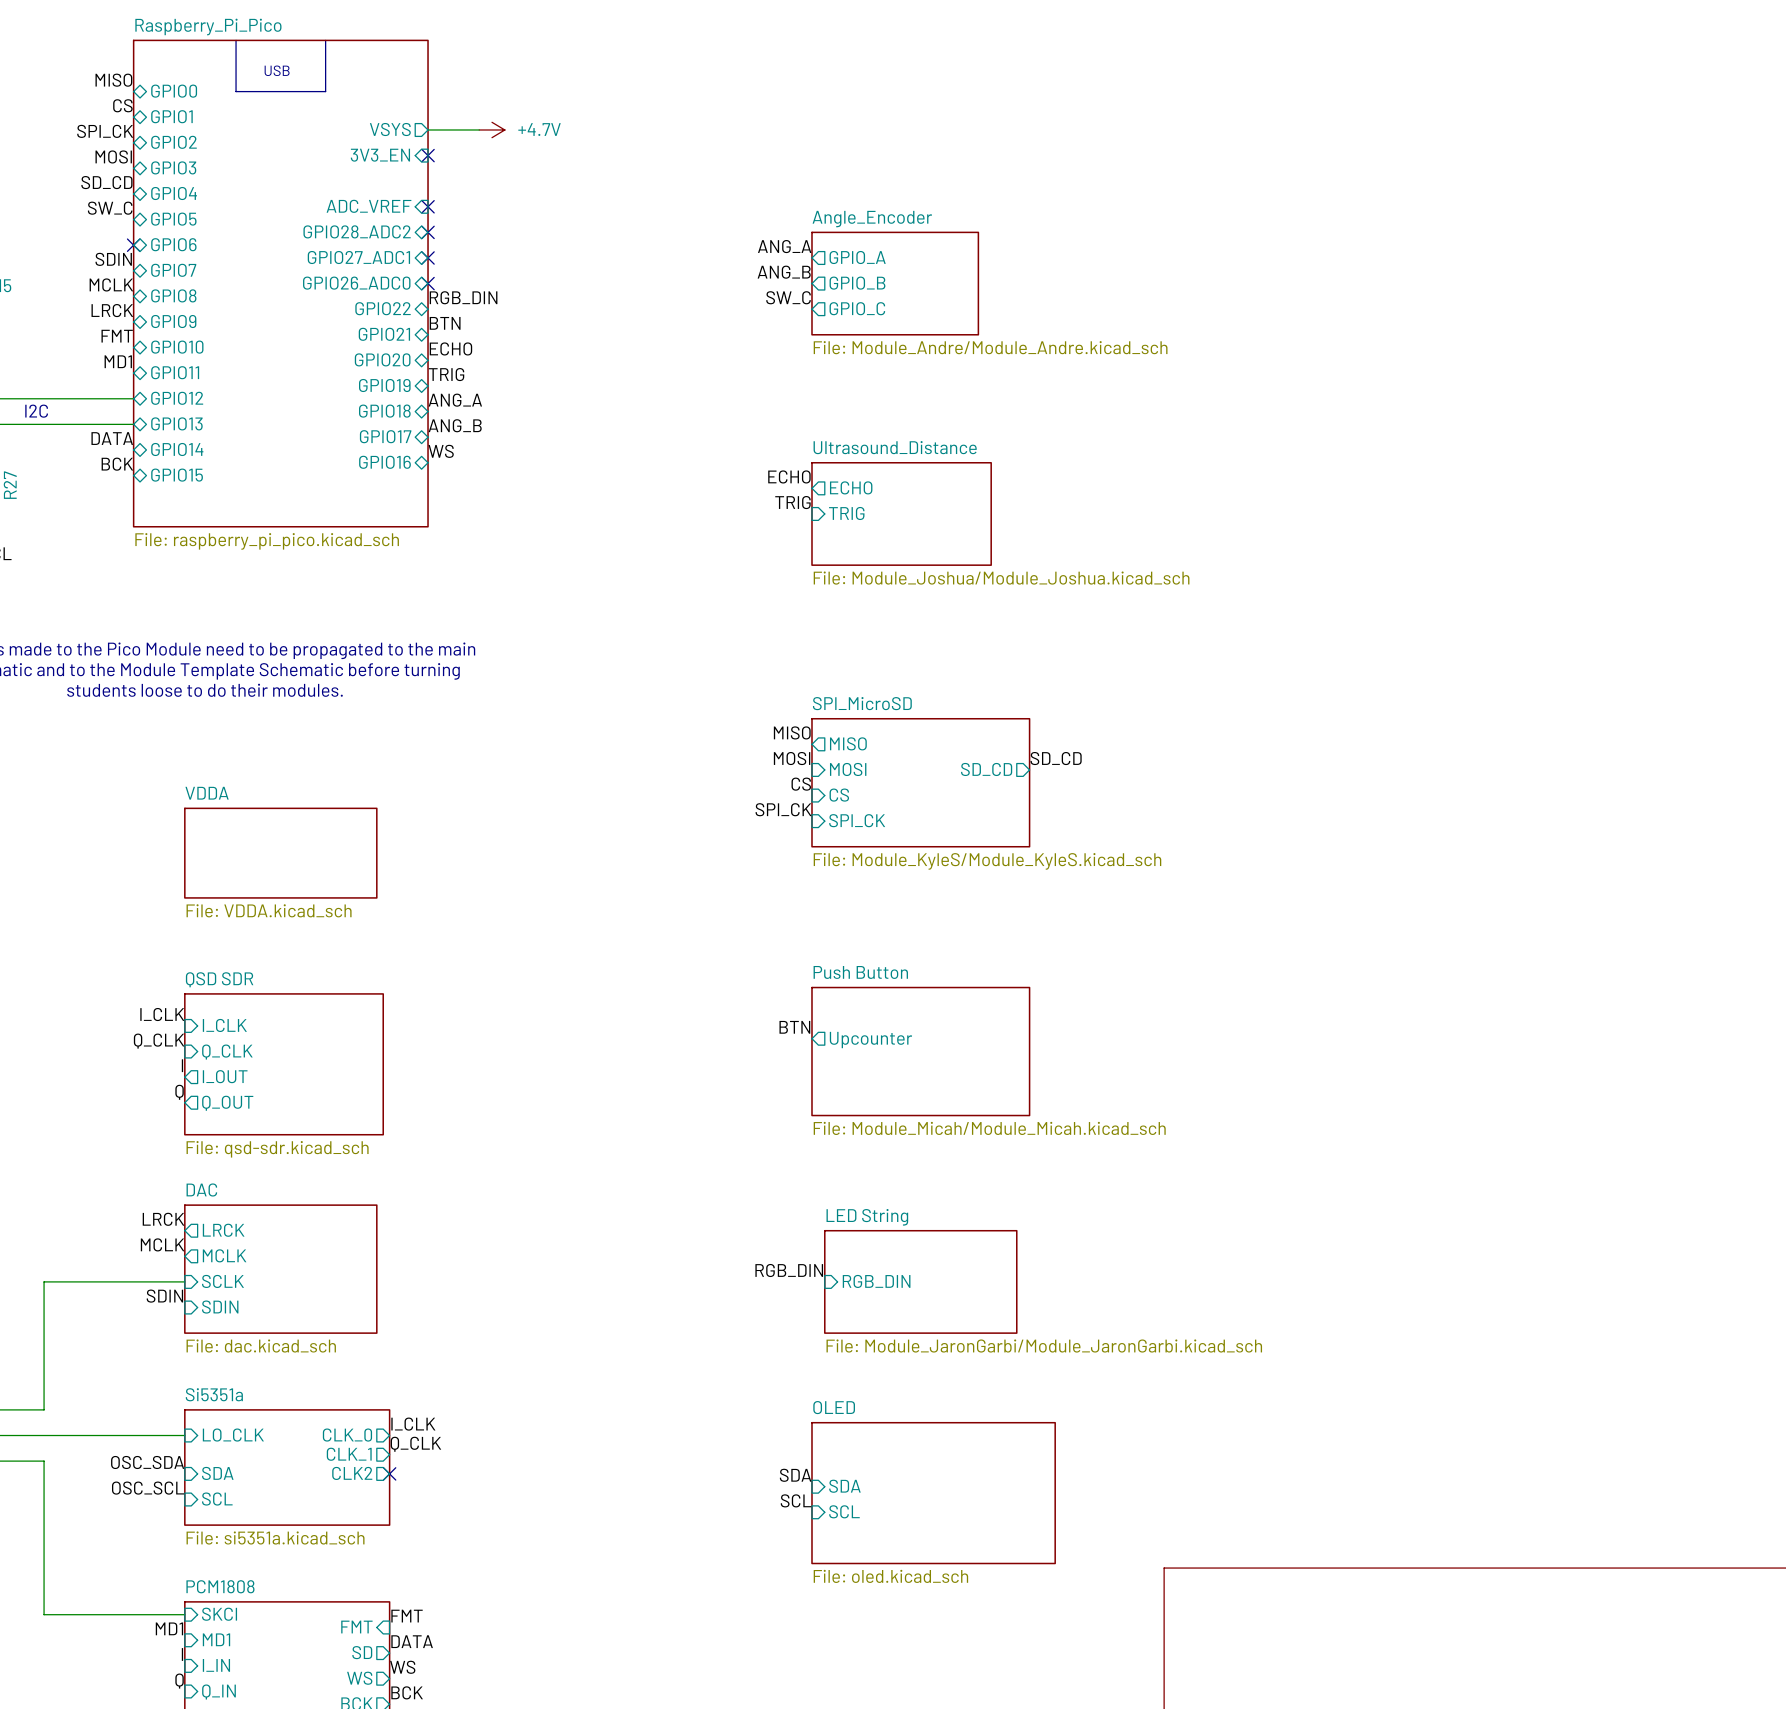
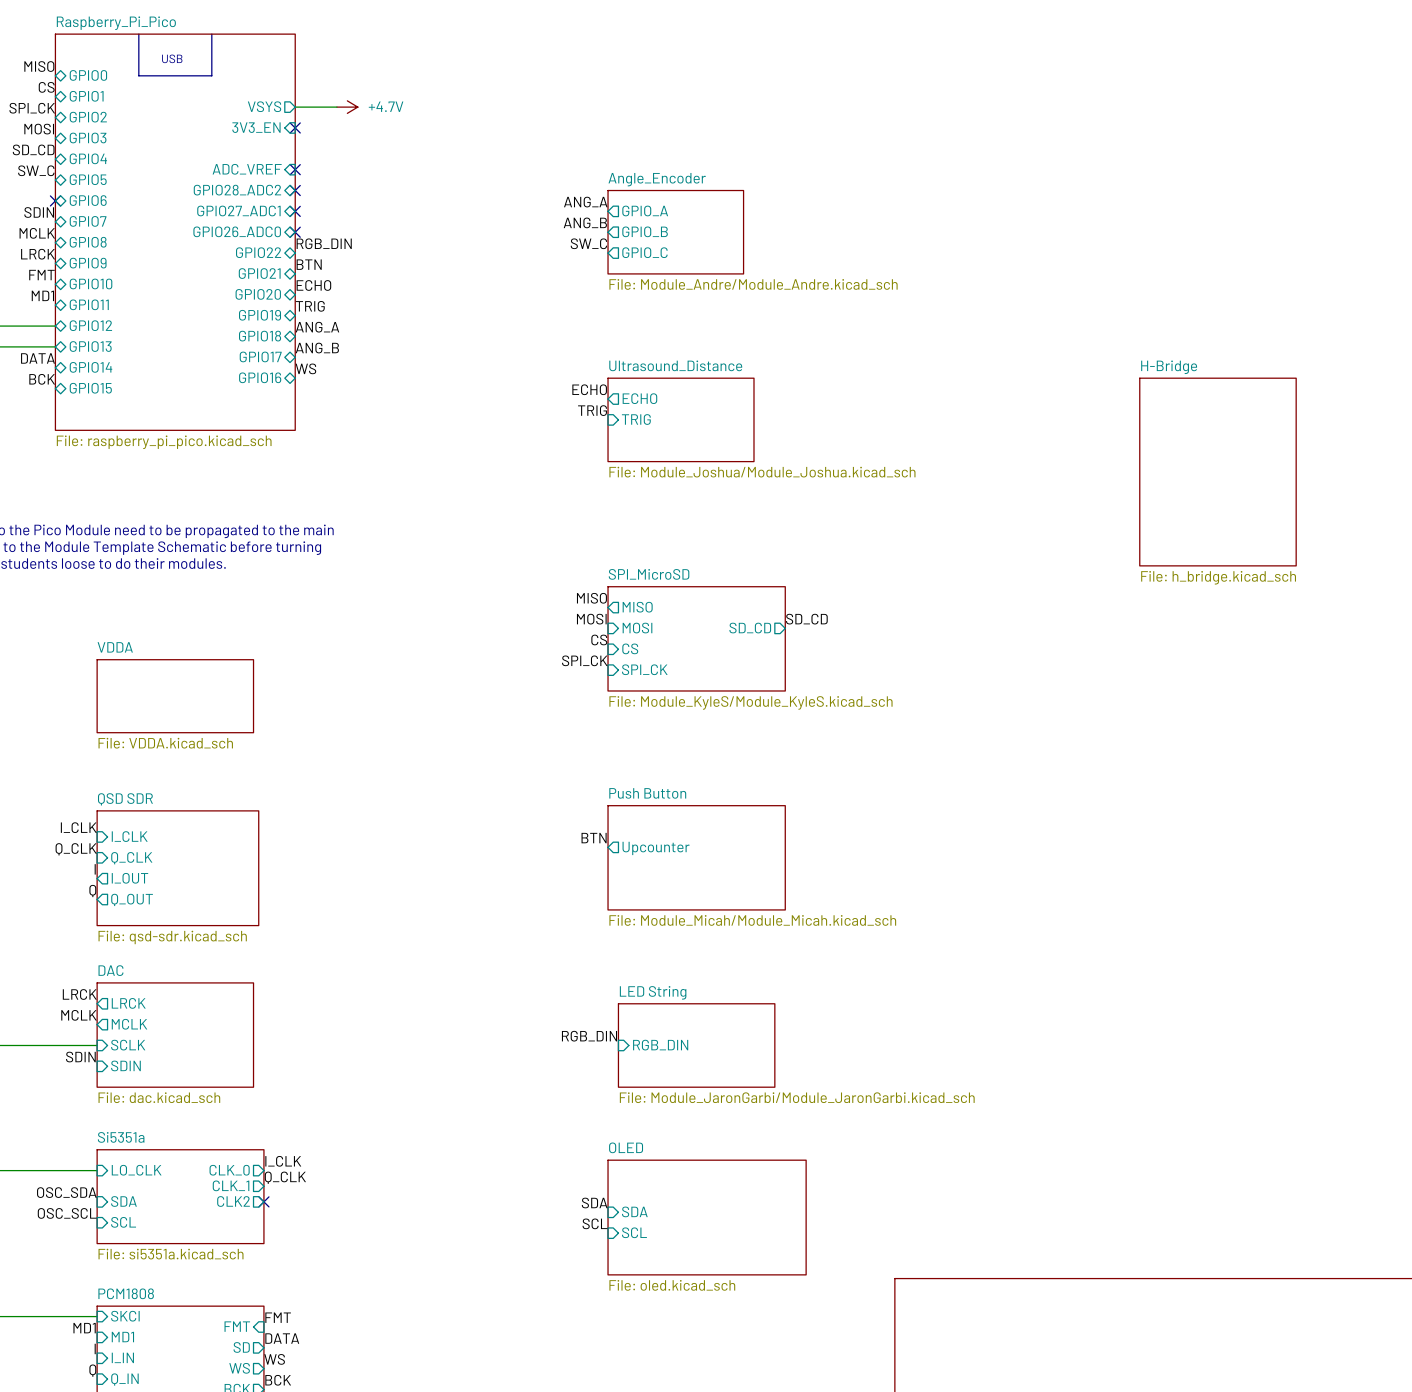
sheet H-Bridge: none -> File: h_bridge.kicad_sch (1217, 472)

